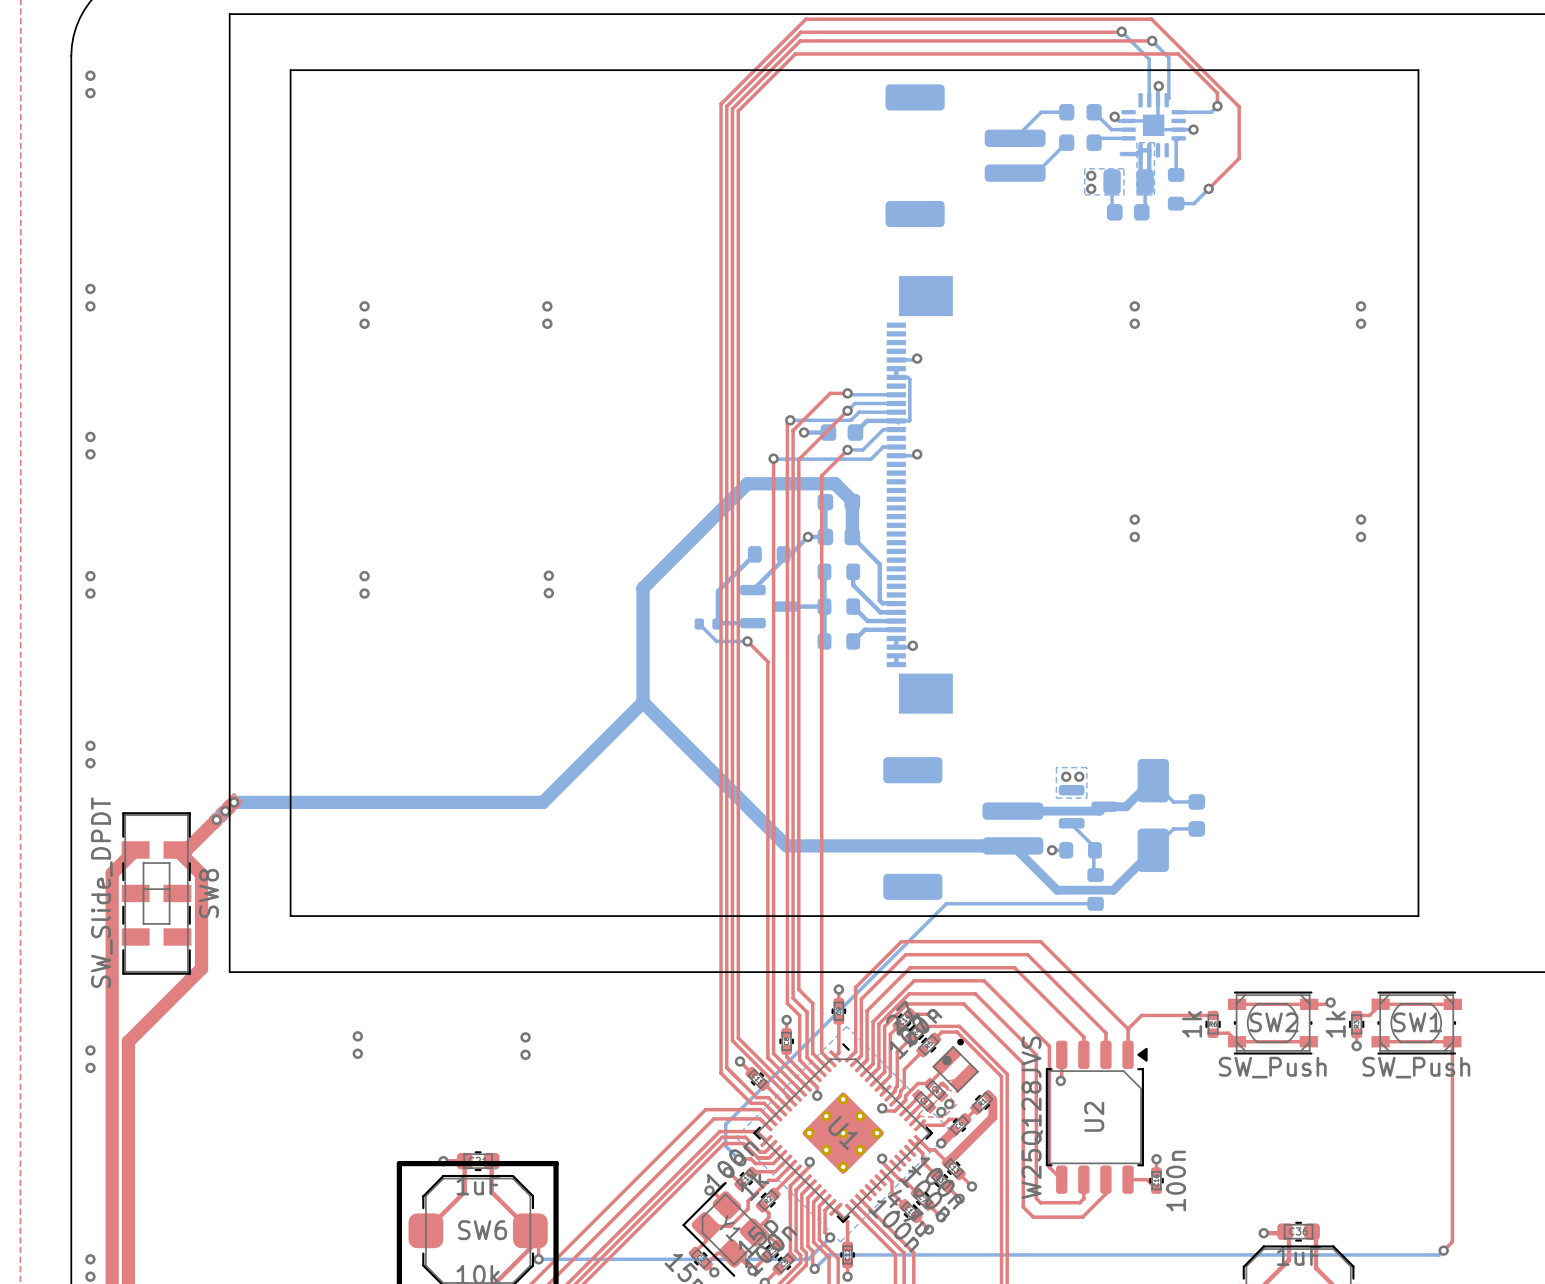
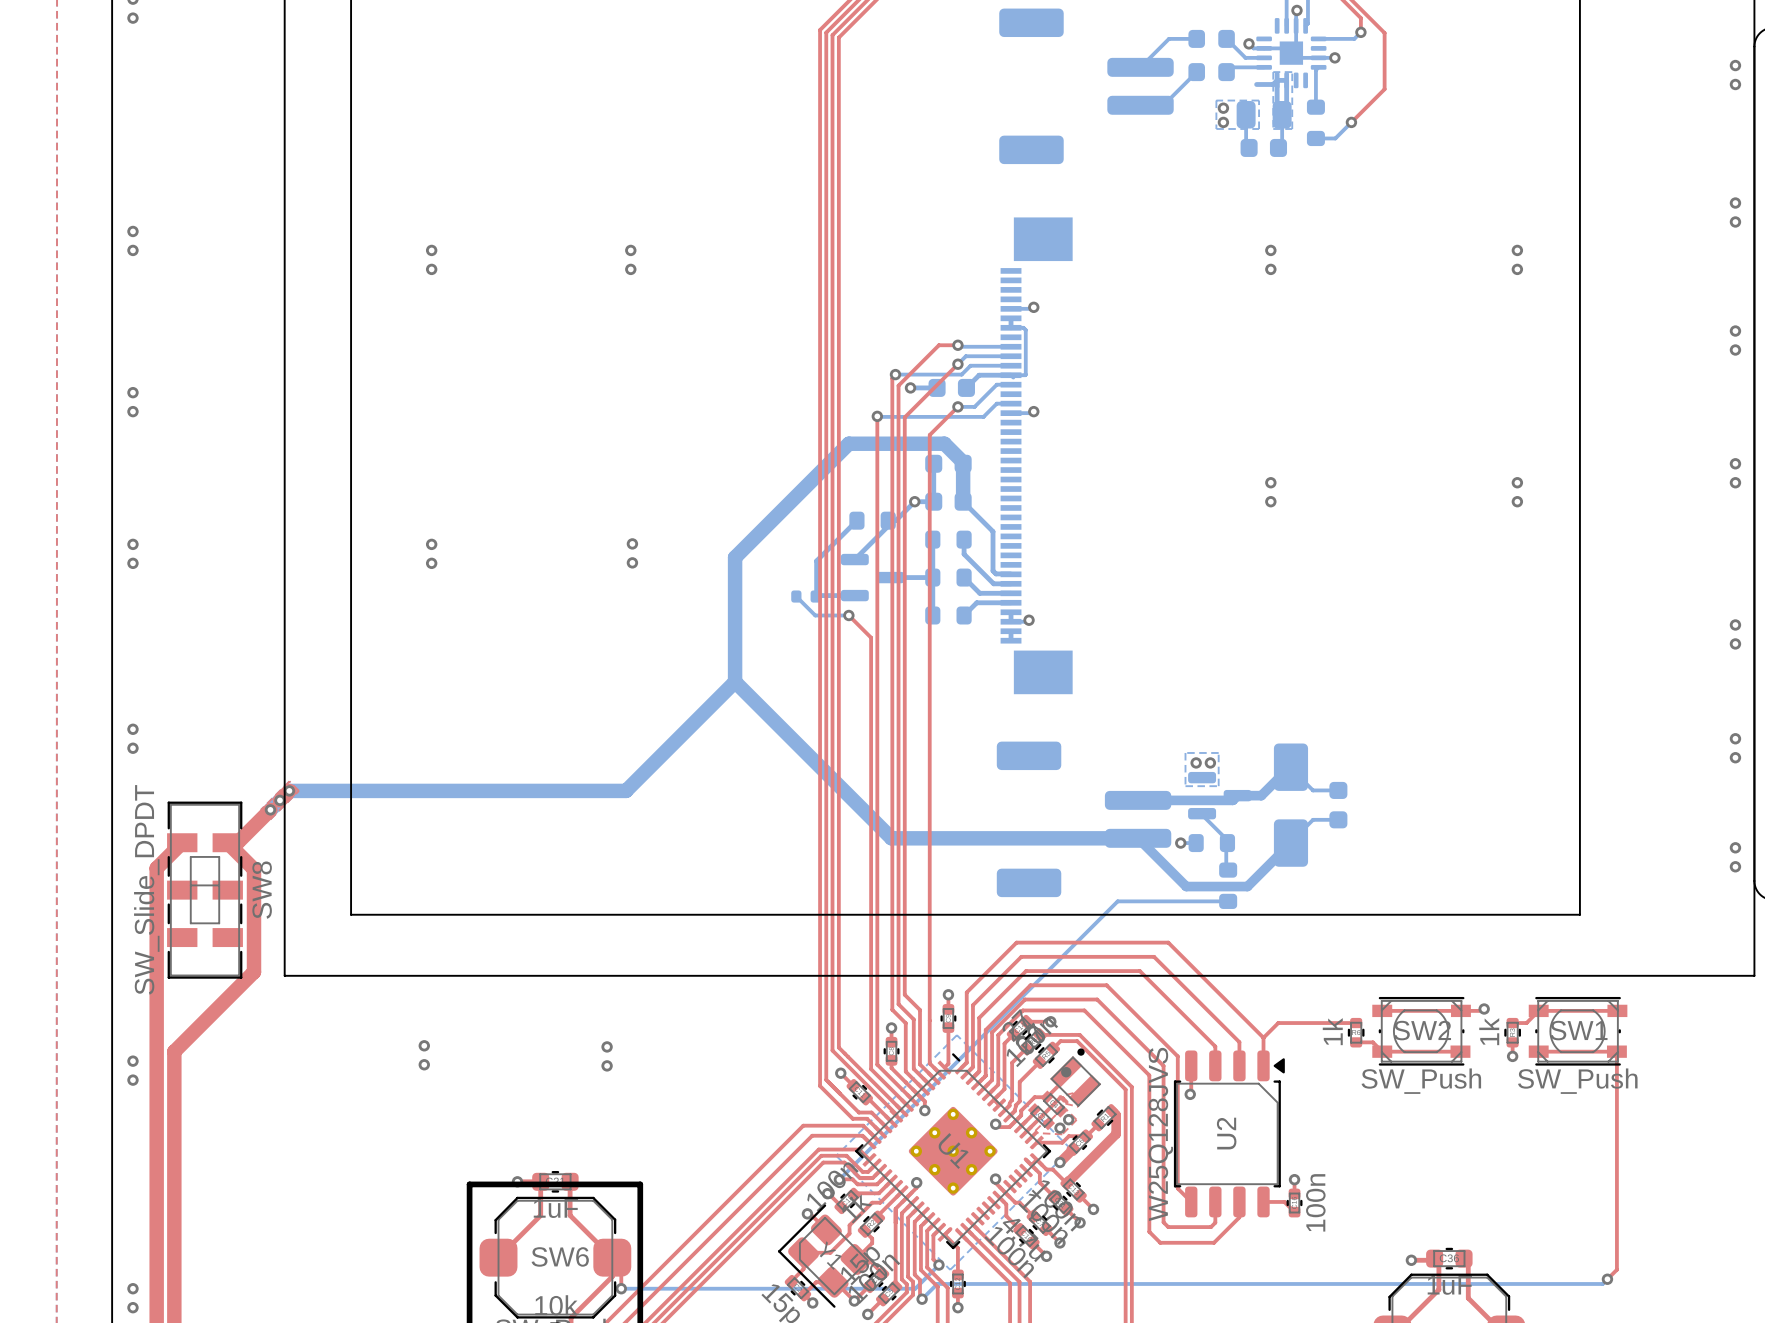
bottom track: (994, 903) (946, 903) (725, 1124) (725, 1146) (738, 1159) -> (1117, 901) (839, 1179)

